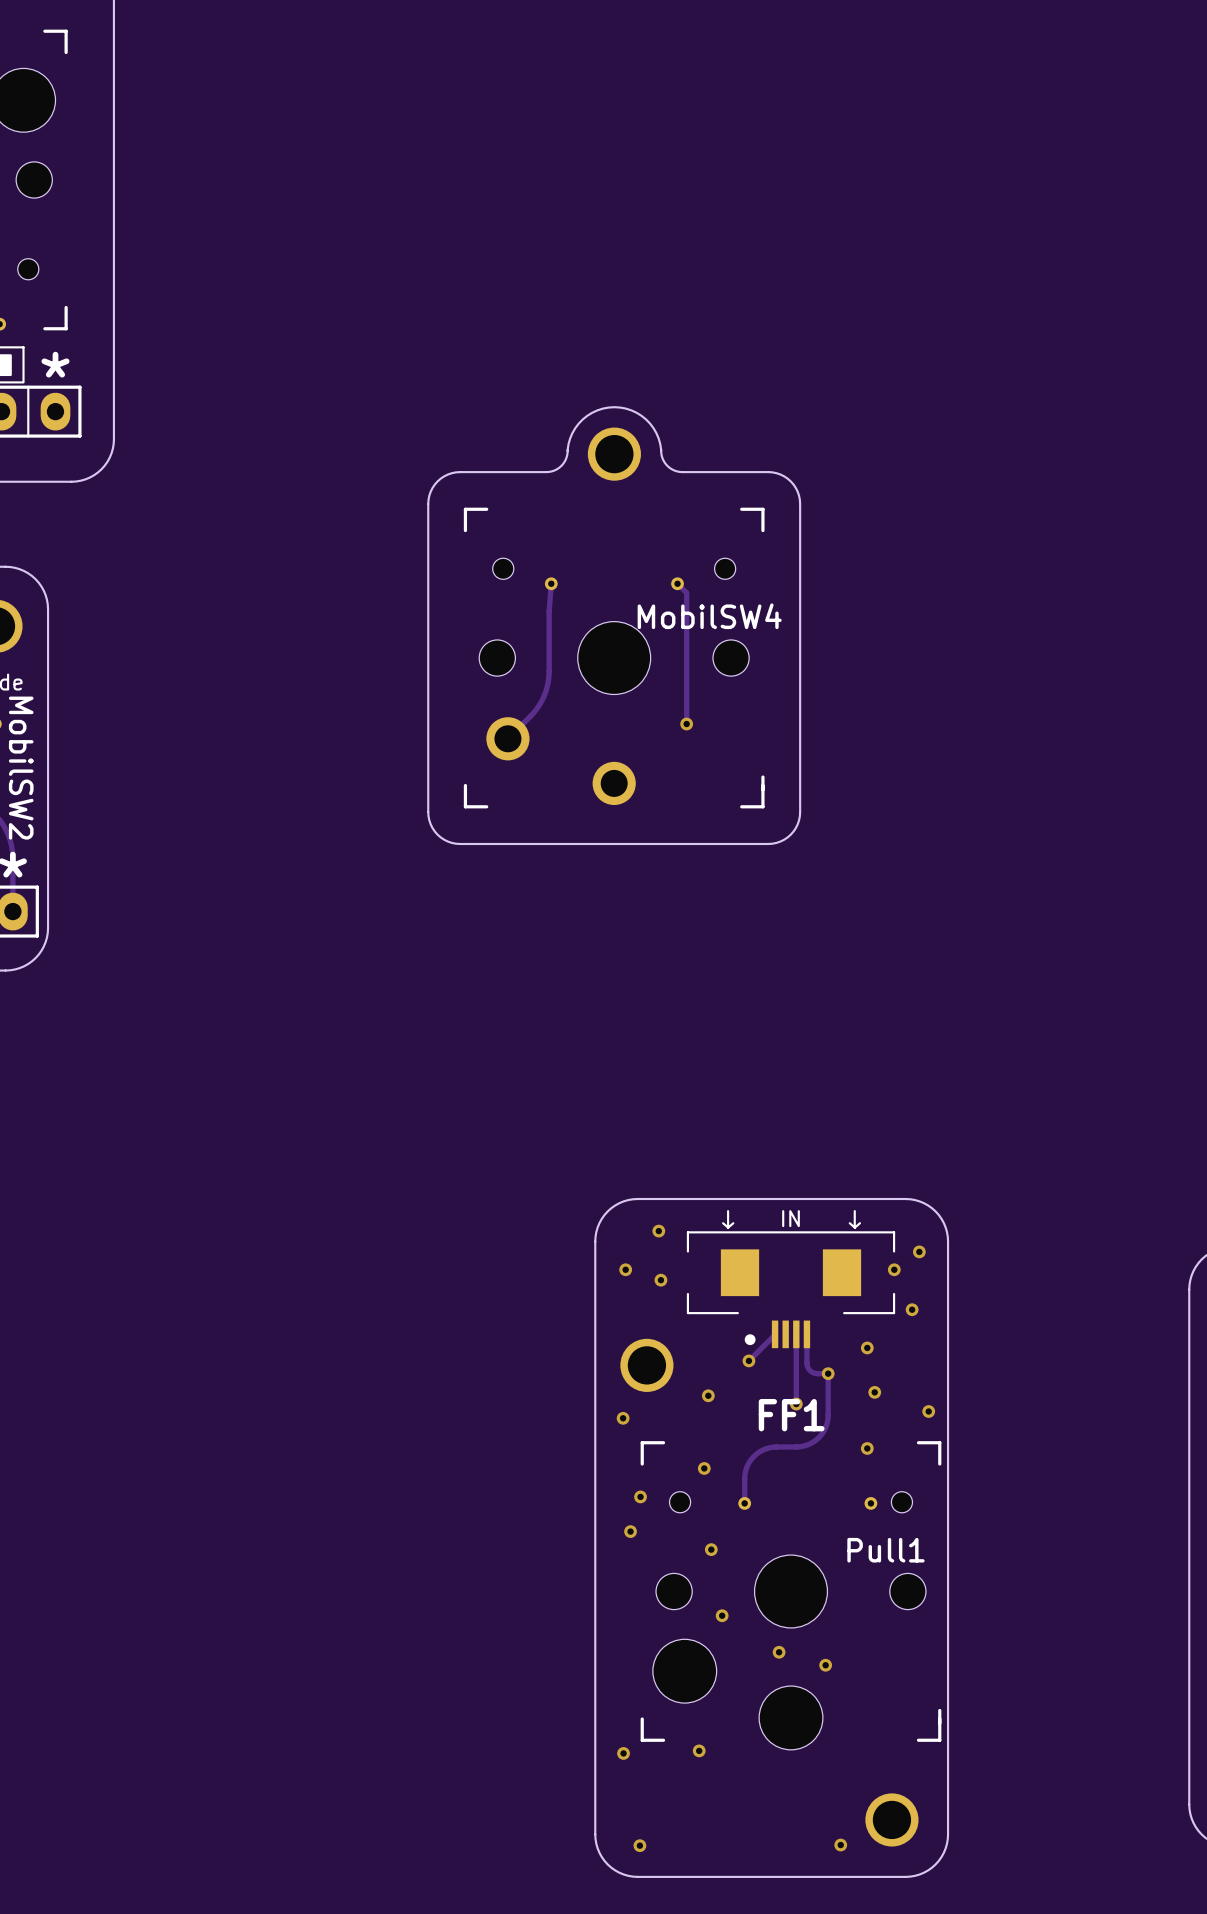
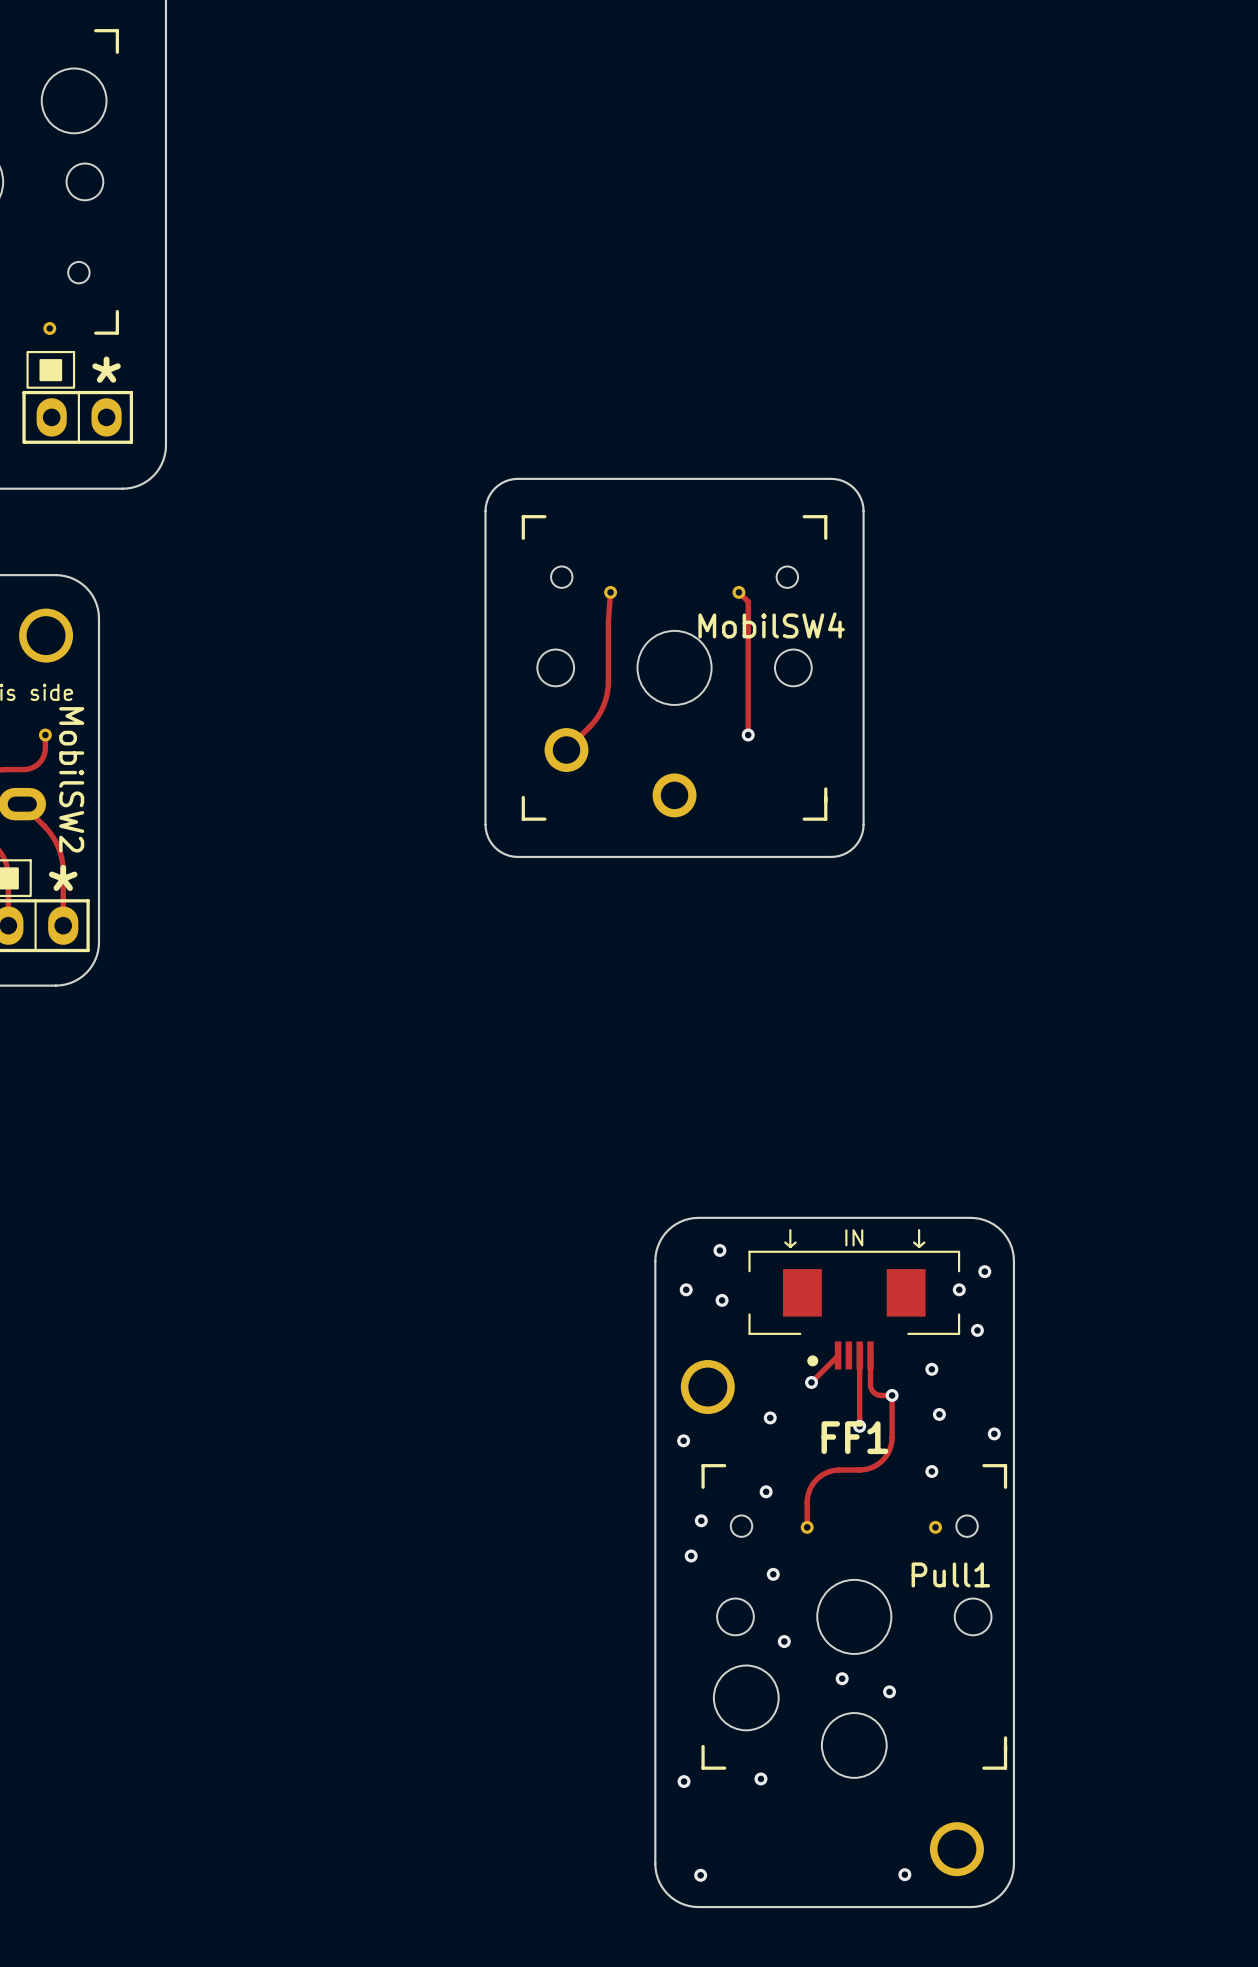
part: (614, 454) -> none
board edge: (546, 472) (555, 469) (564, 462) (572, 433) (582, 419) (597, 410) (614, 407) (631, 410) (646, 419) (656, 433) (664, 462) (671, 468) (682, 472) -> (605, 478) (743, 478)

